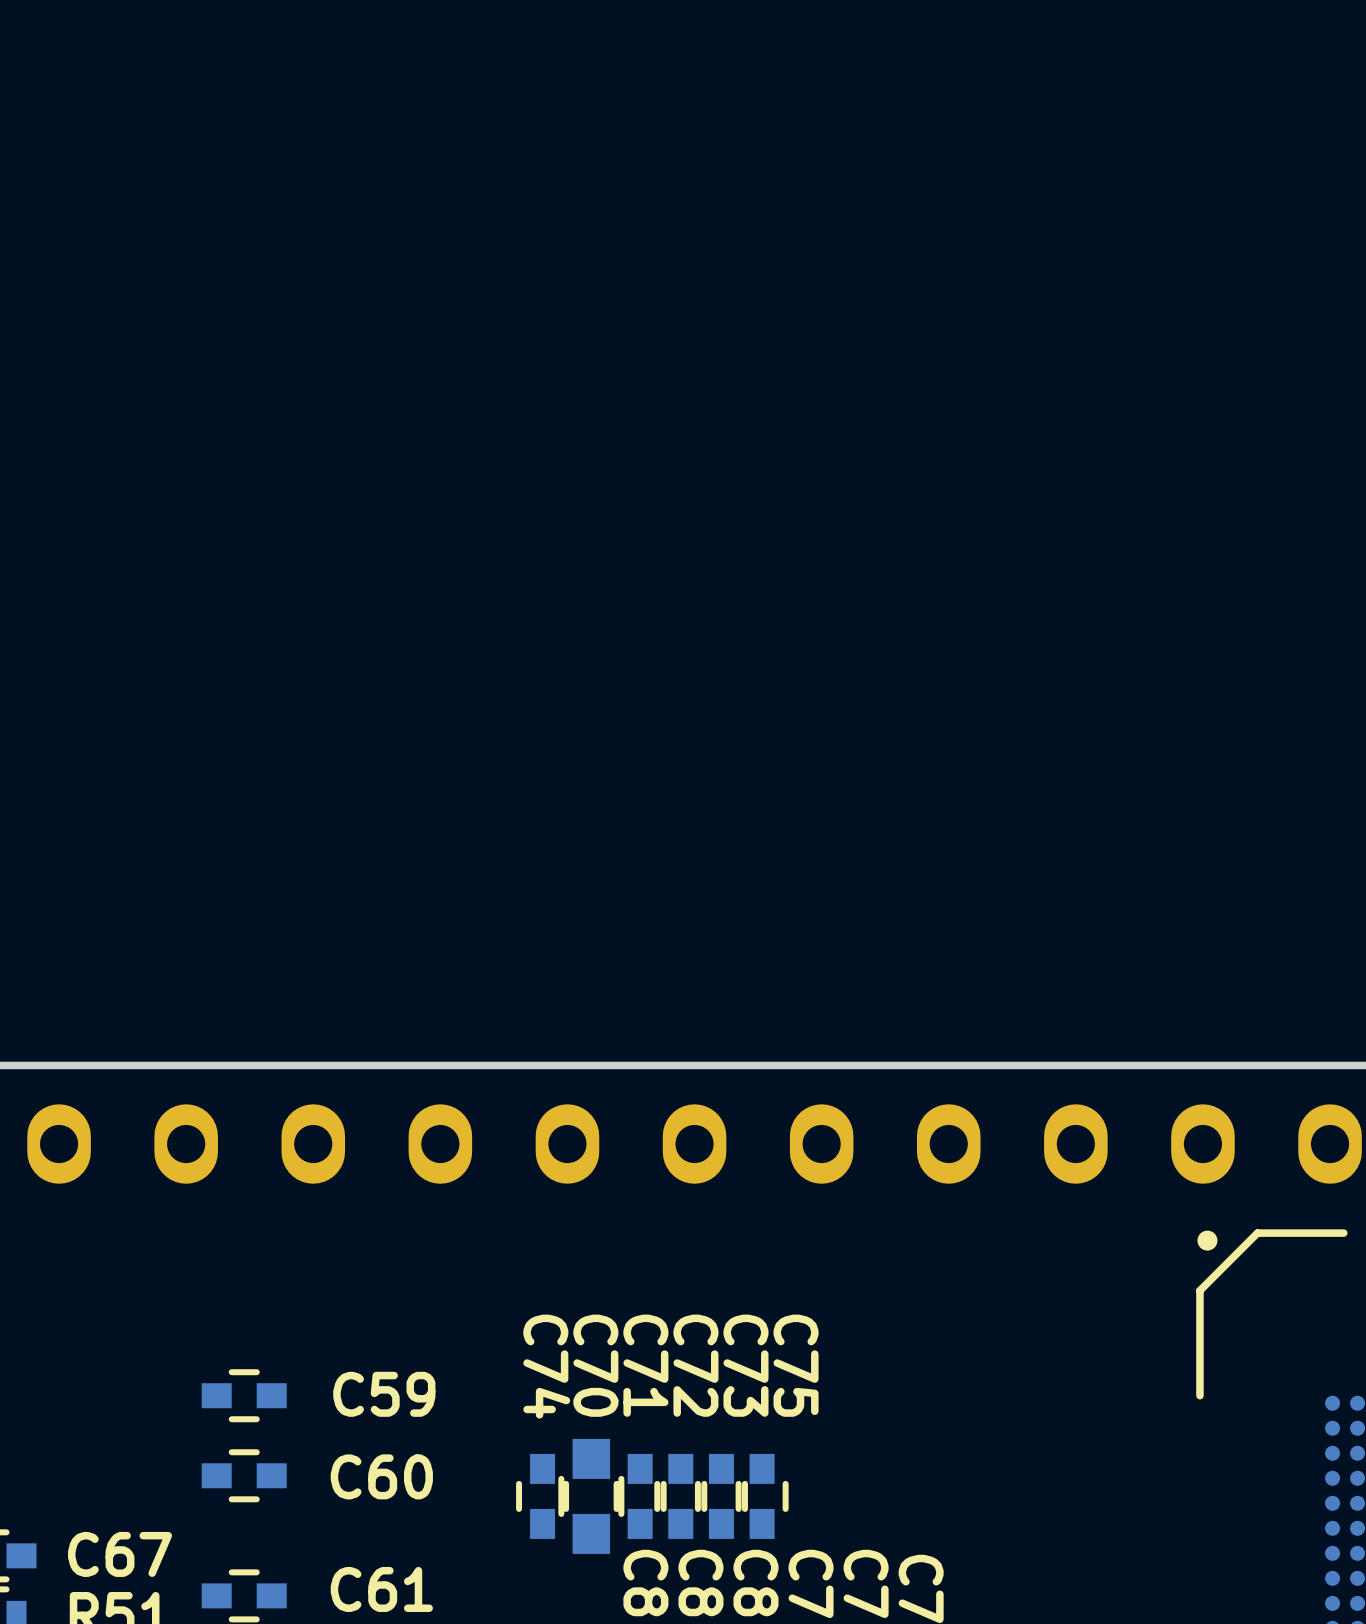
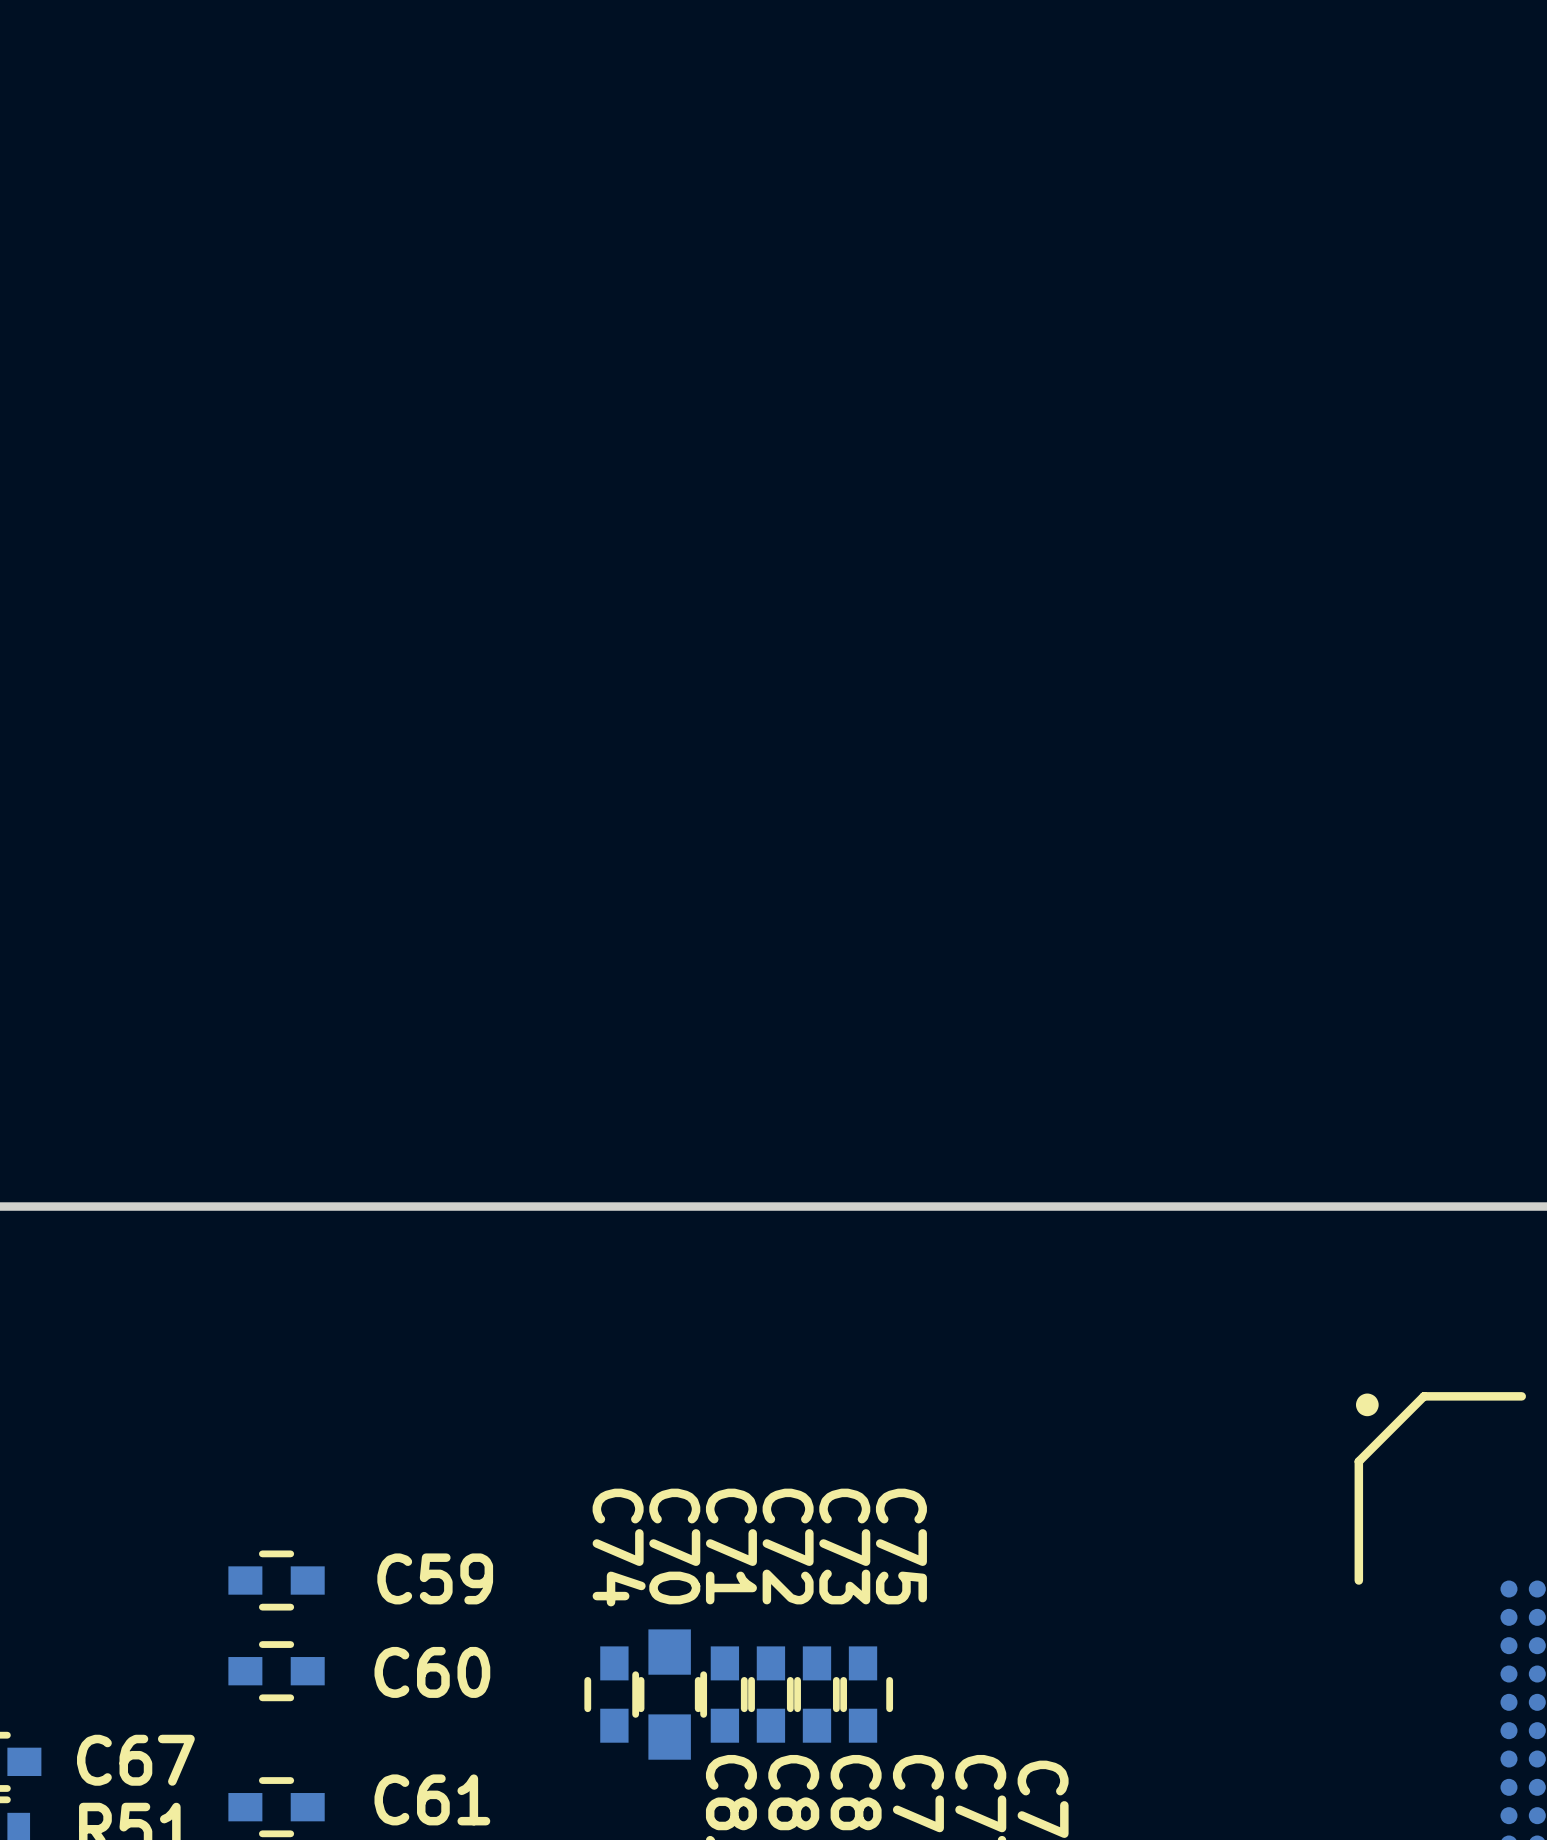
part: (59, 1144) -> none
part: (186, 1144) -> none
part: (313, 1144) -> none
part: (440, 1144) -> none
part: (567, 1144) -> none
part: (694, 1144) -> none
part: (821, 1144) -> none
part: (948, 1144) -> none
part: (1075, 1144) -> none
part: (1202, 1144) -> none
part: (1330, 1144) -> none

